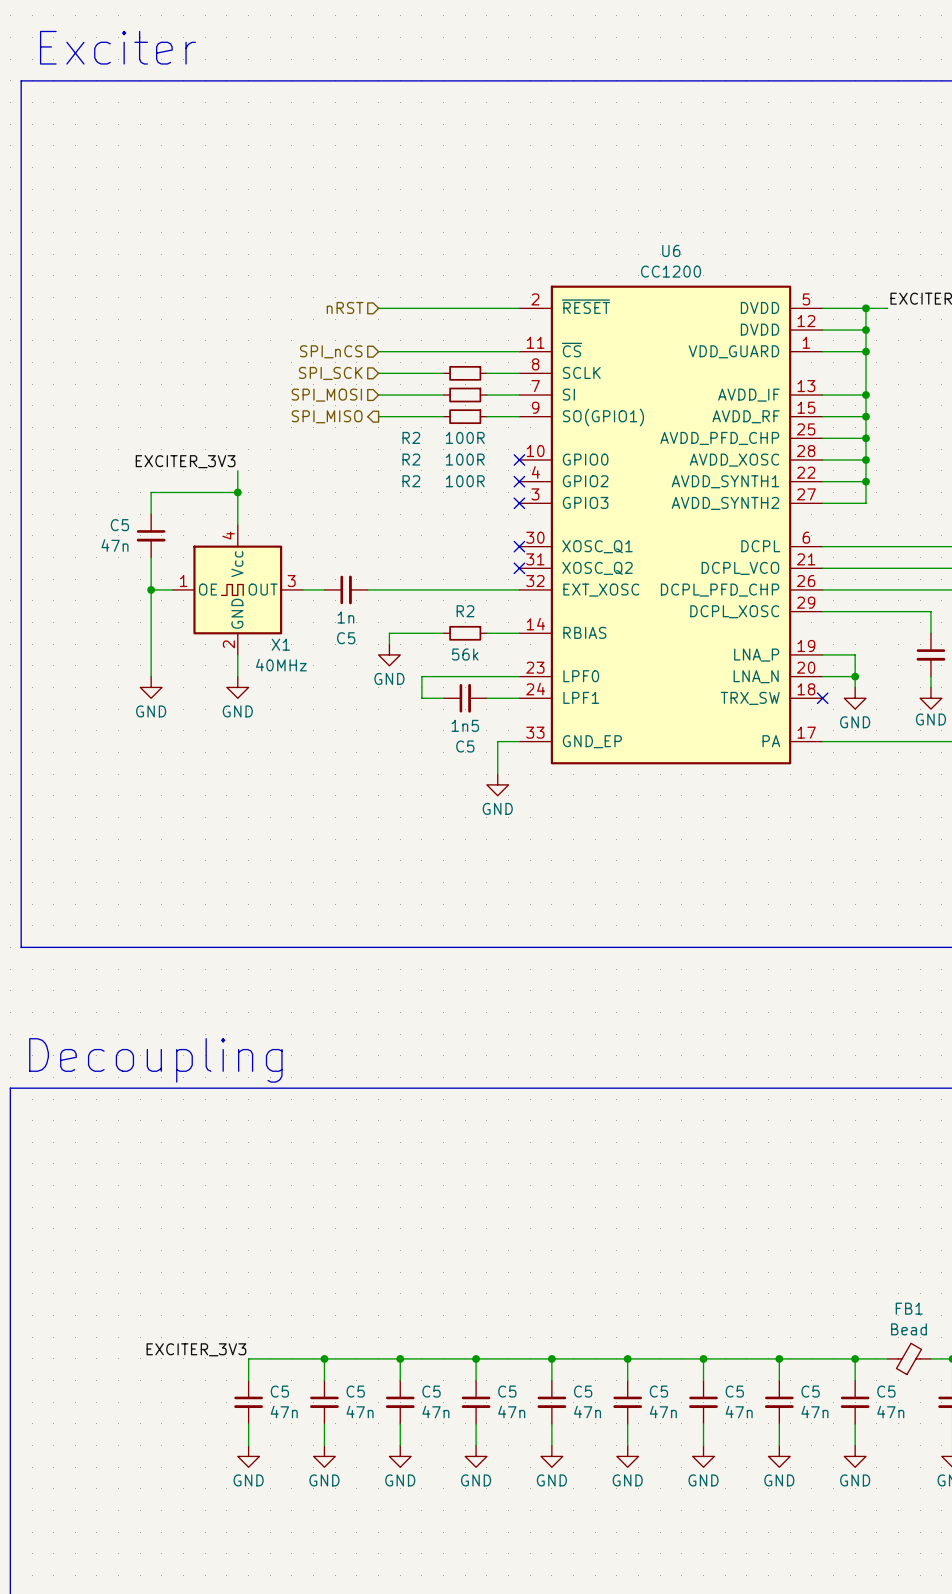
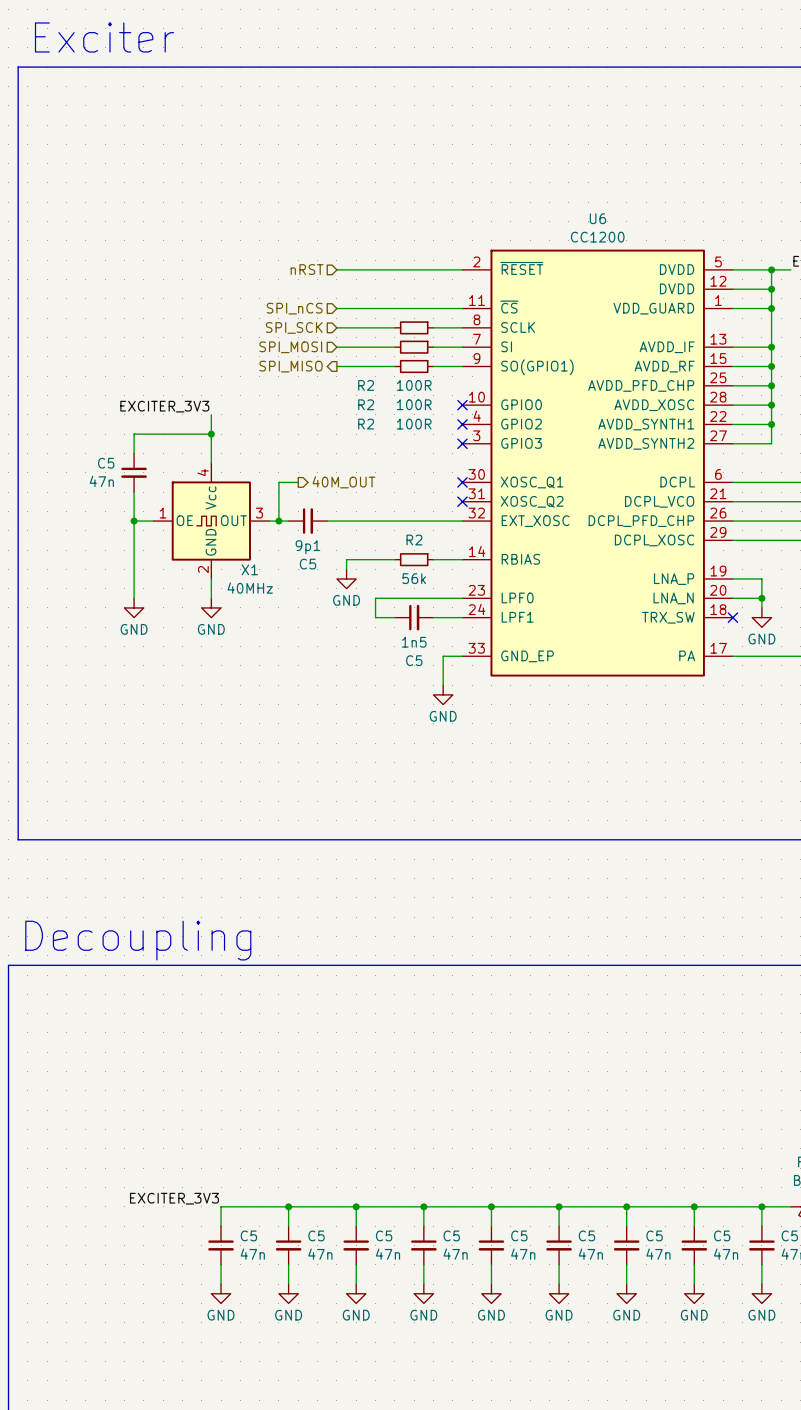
wire: none -> (298, 482) (278, 482) (278, 521)
hierarchical label: none -> 40M_OUT (343, 482)
junction: none -> (278, 521)
C5 value: 1n (345, 617) -> 9p1 (307, 547)

